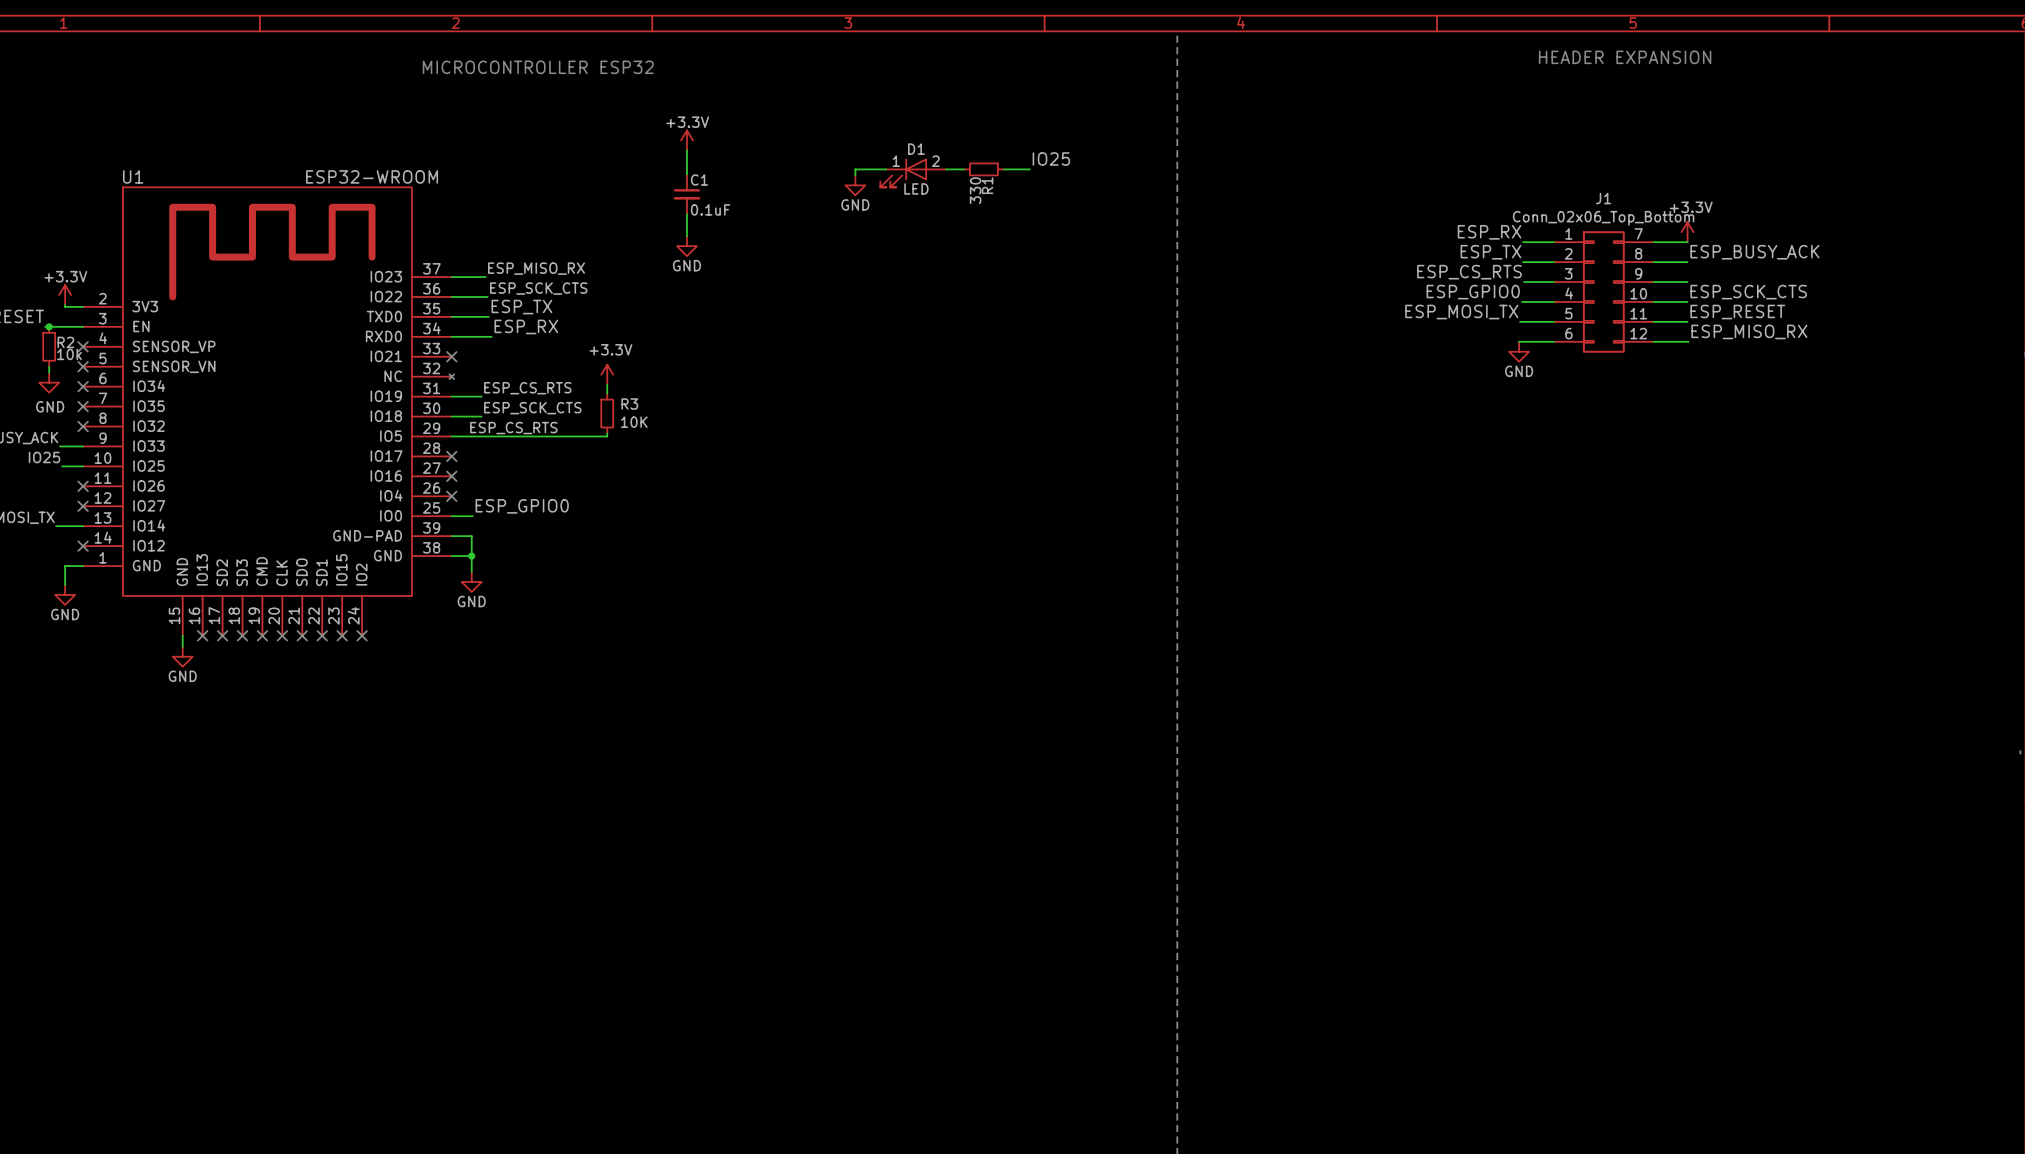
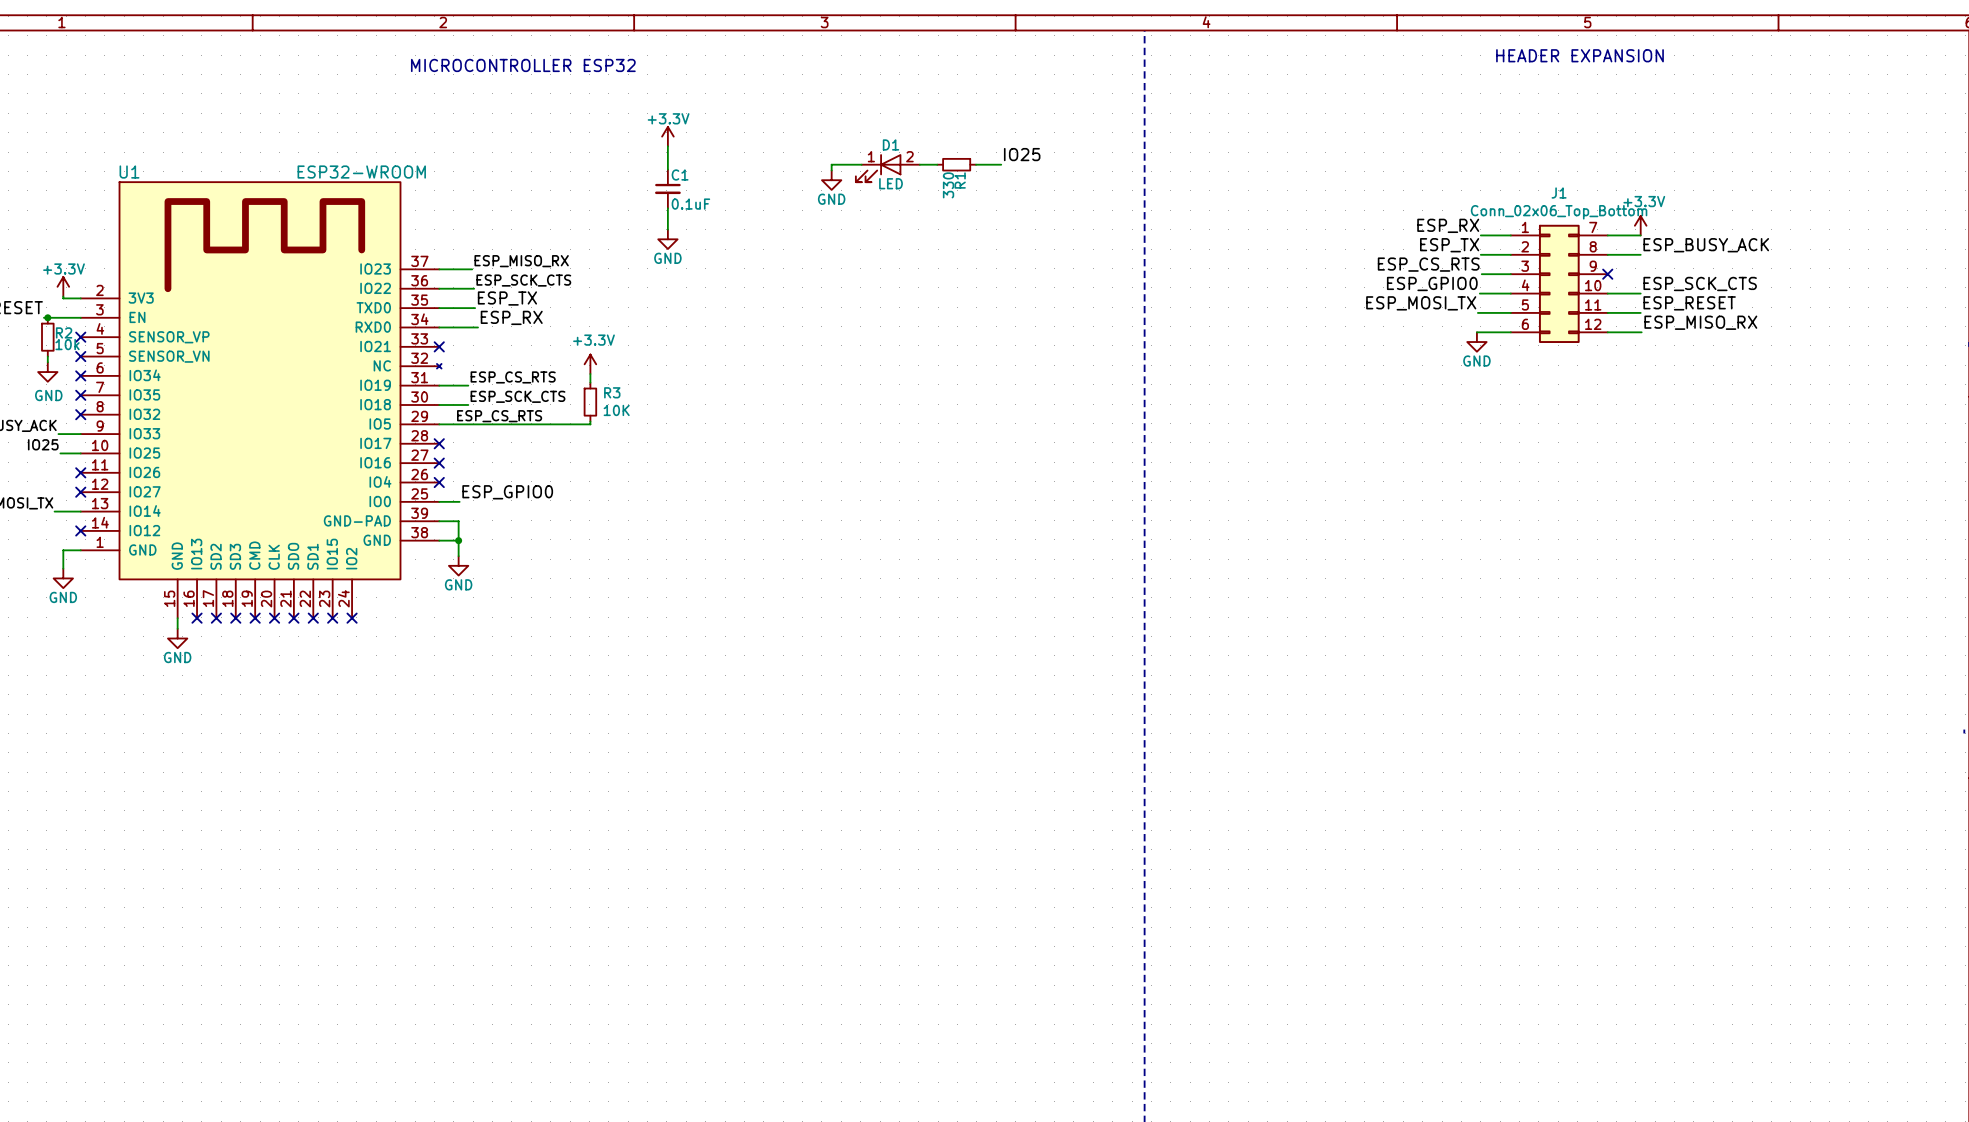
wire: (1653, 282) (1687, 282) -> none
no-connect mark: none -> (1607, 274)

